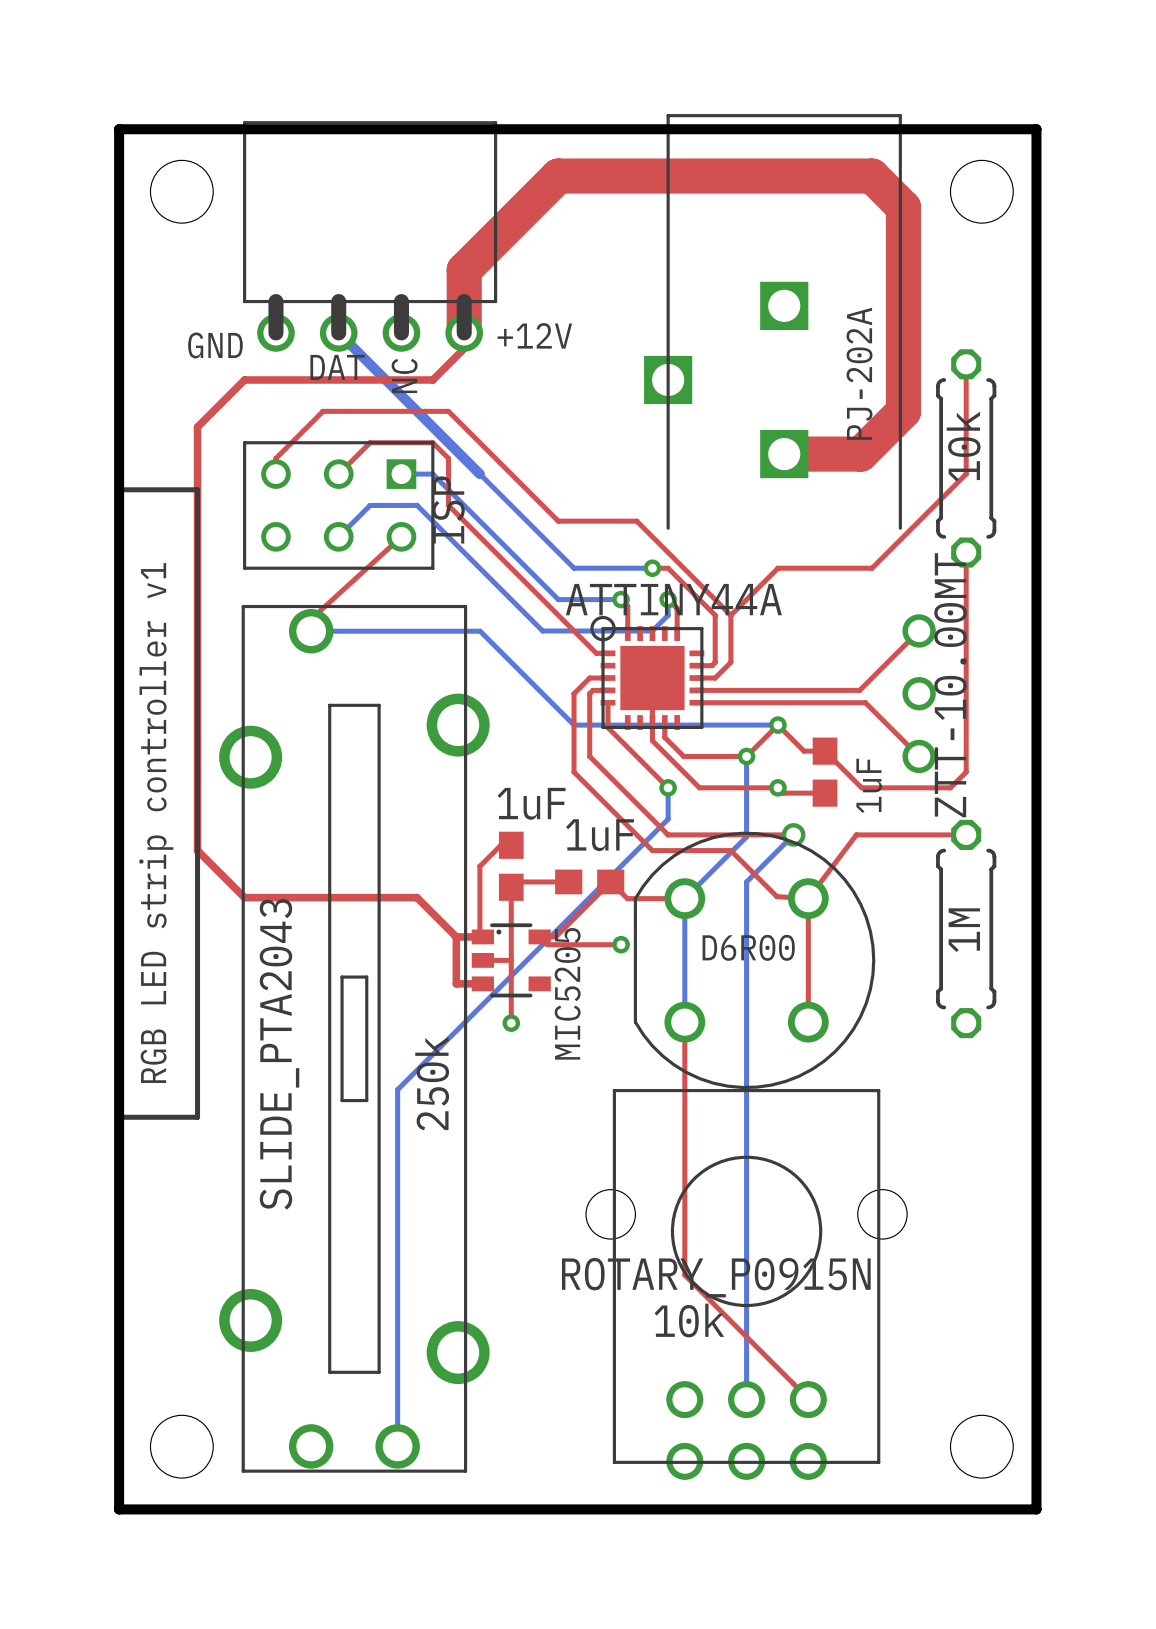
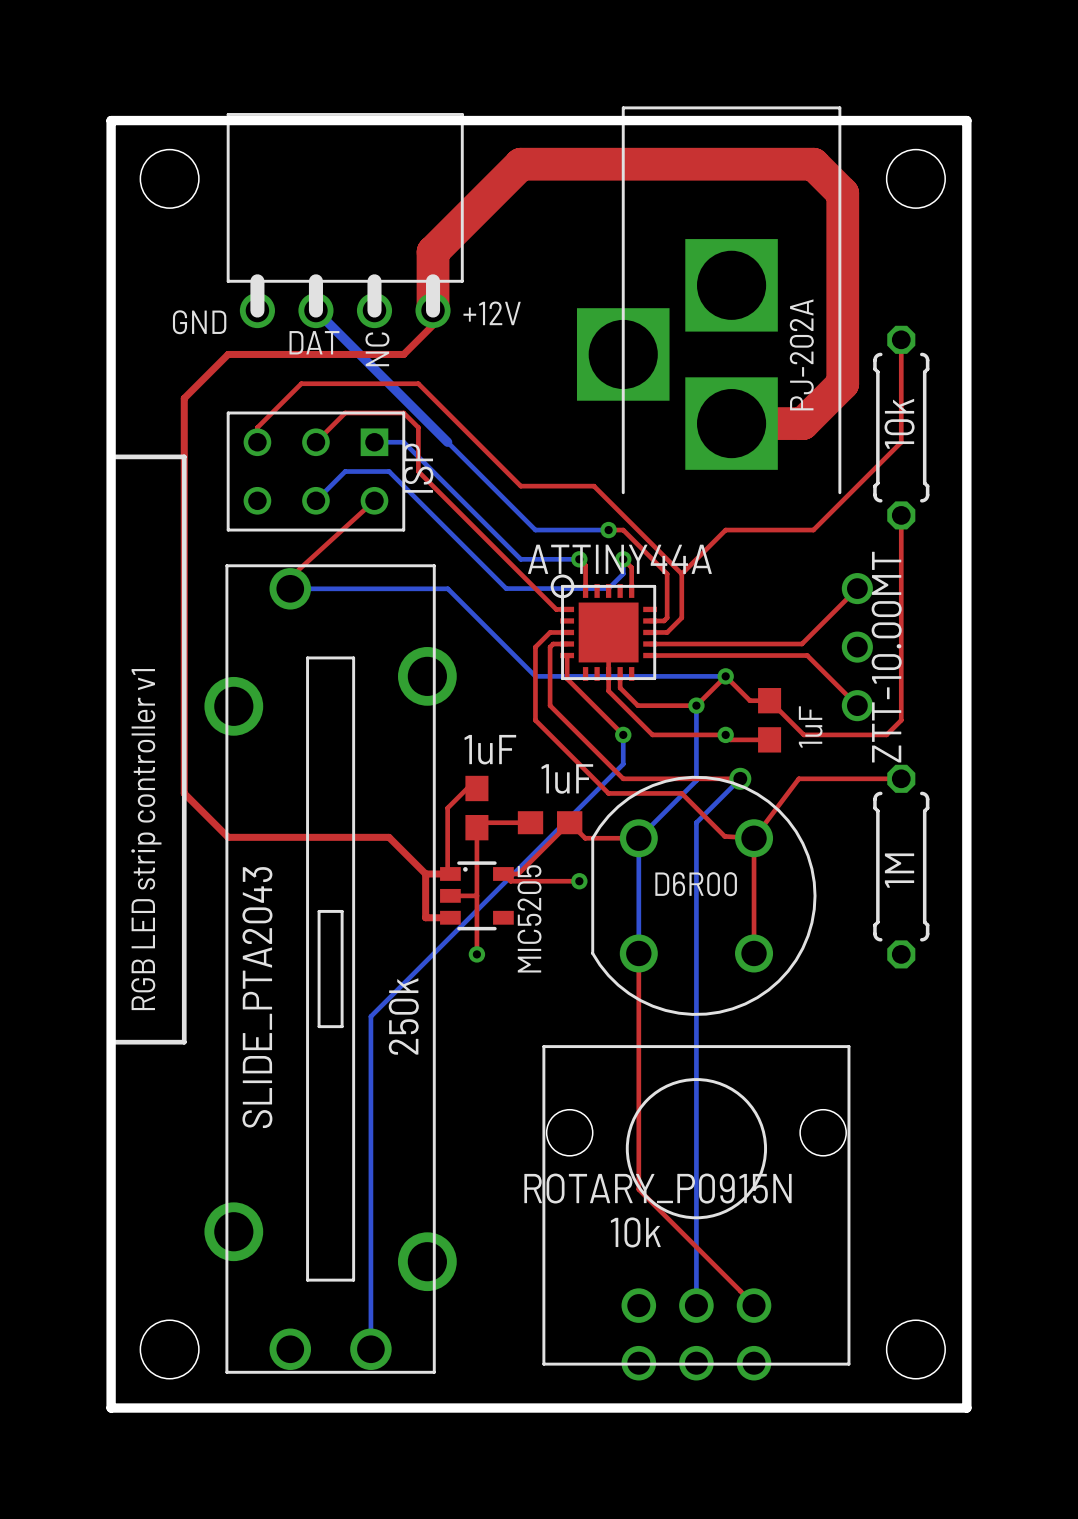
part footprint: [644, 114, 902, 530] -> [576, 106, 842, 495]
ROTARY_P0915N footprint: [586, 1089, 908, 1480] -> [542, 1045, 851, 1381]

